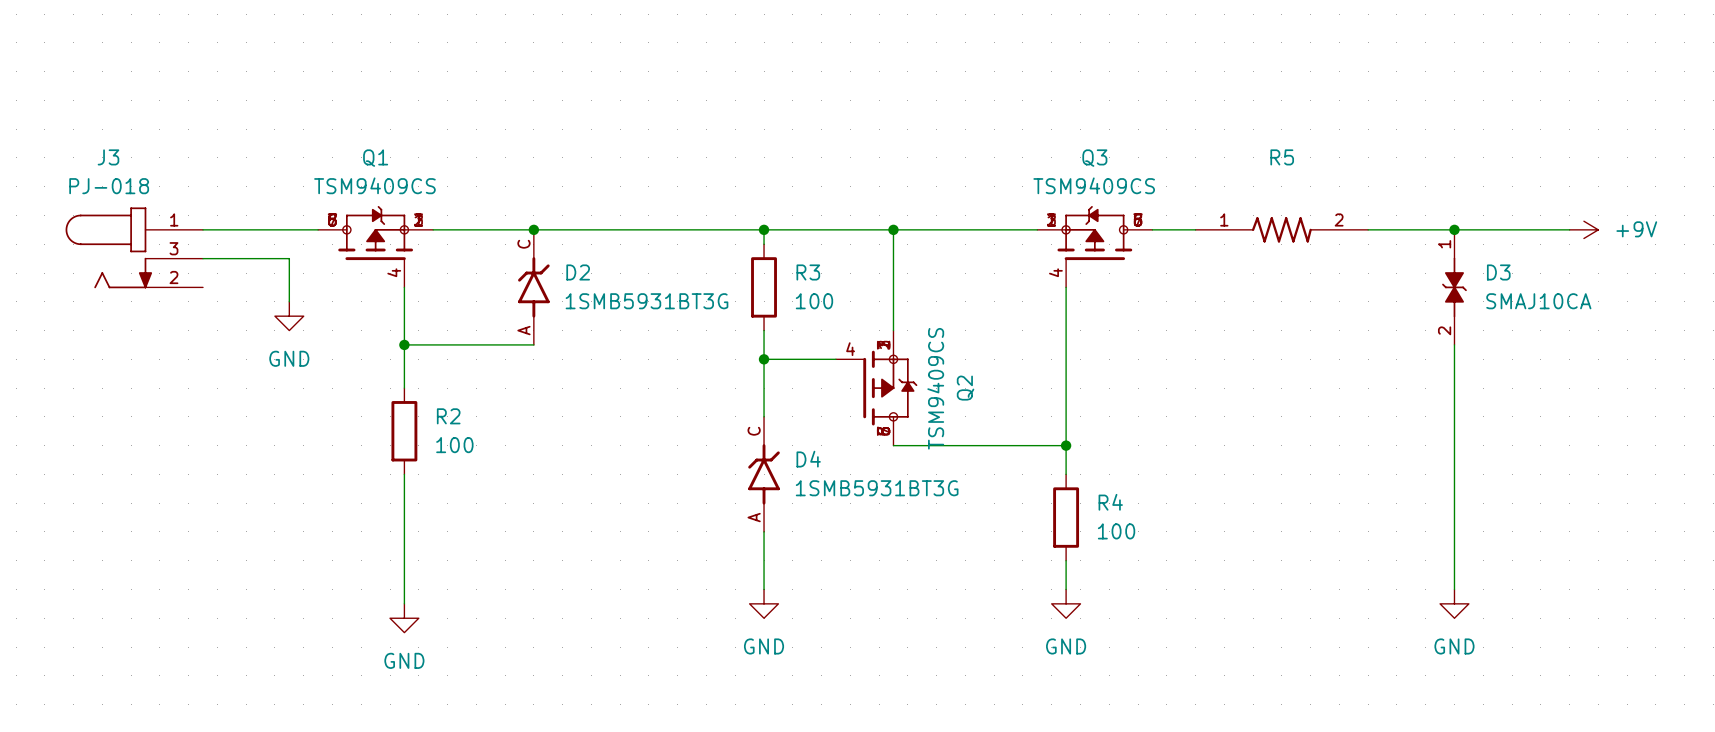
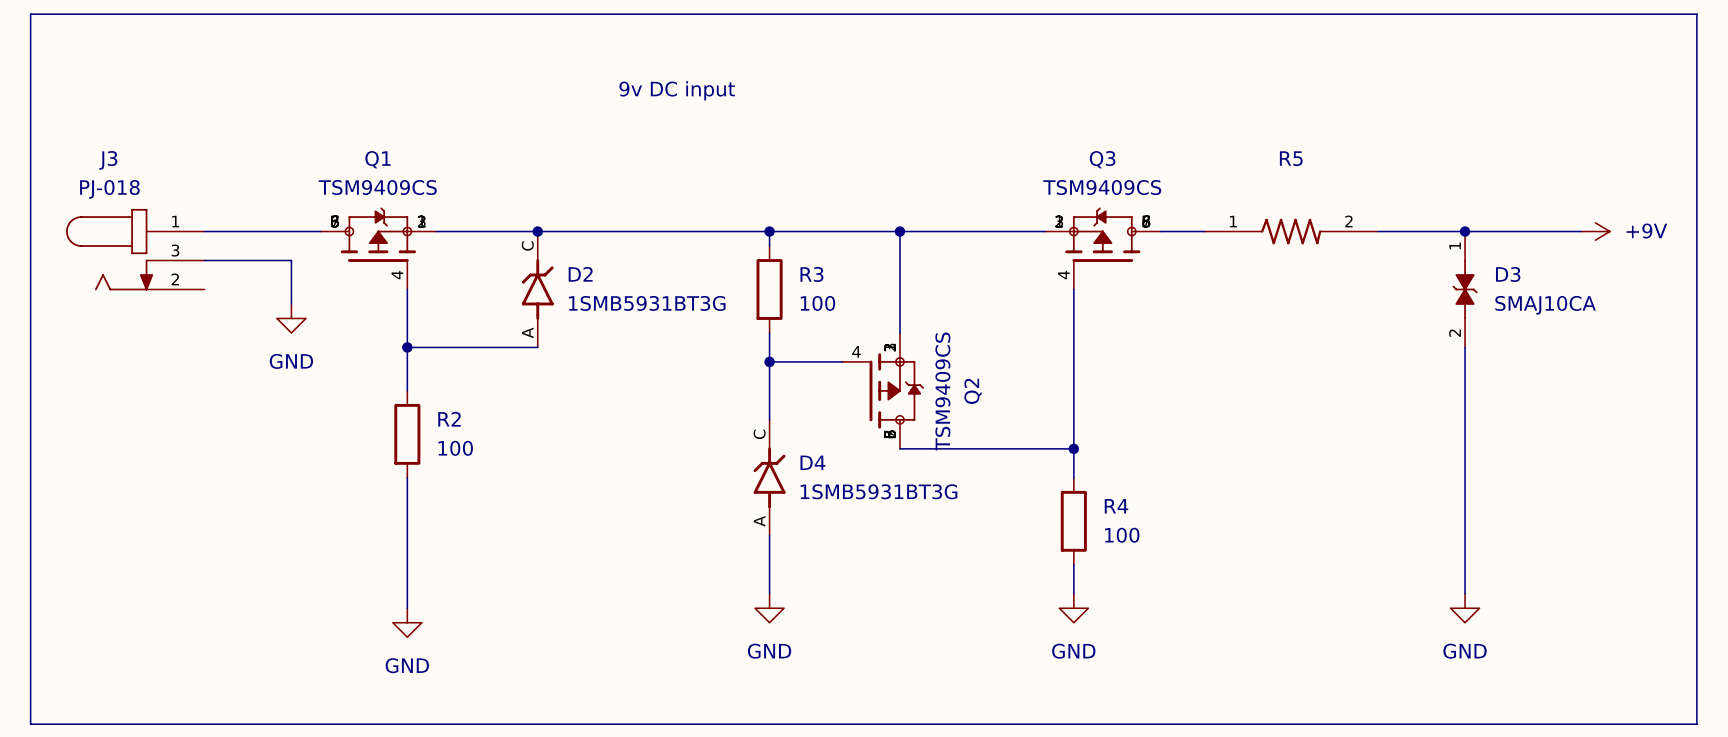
line: none -> (30, 14) (1696, 14) (1696, 724) (30, 724) (30, 14)
text: none -> 9v DC input (677, 90)

